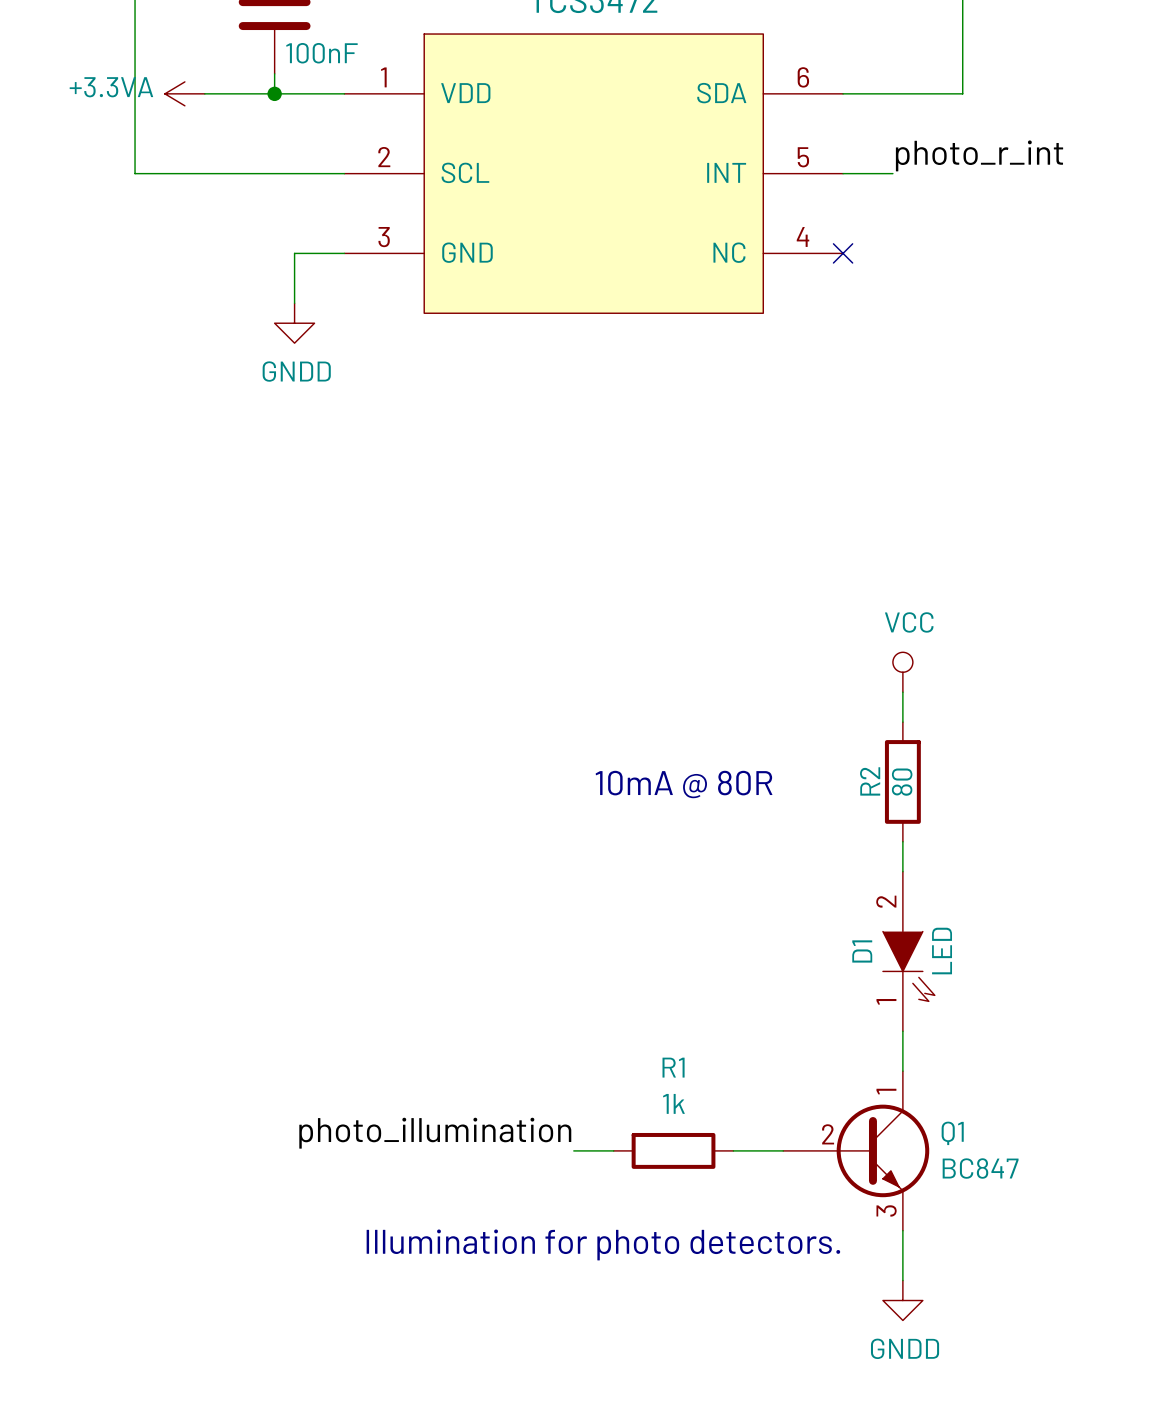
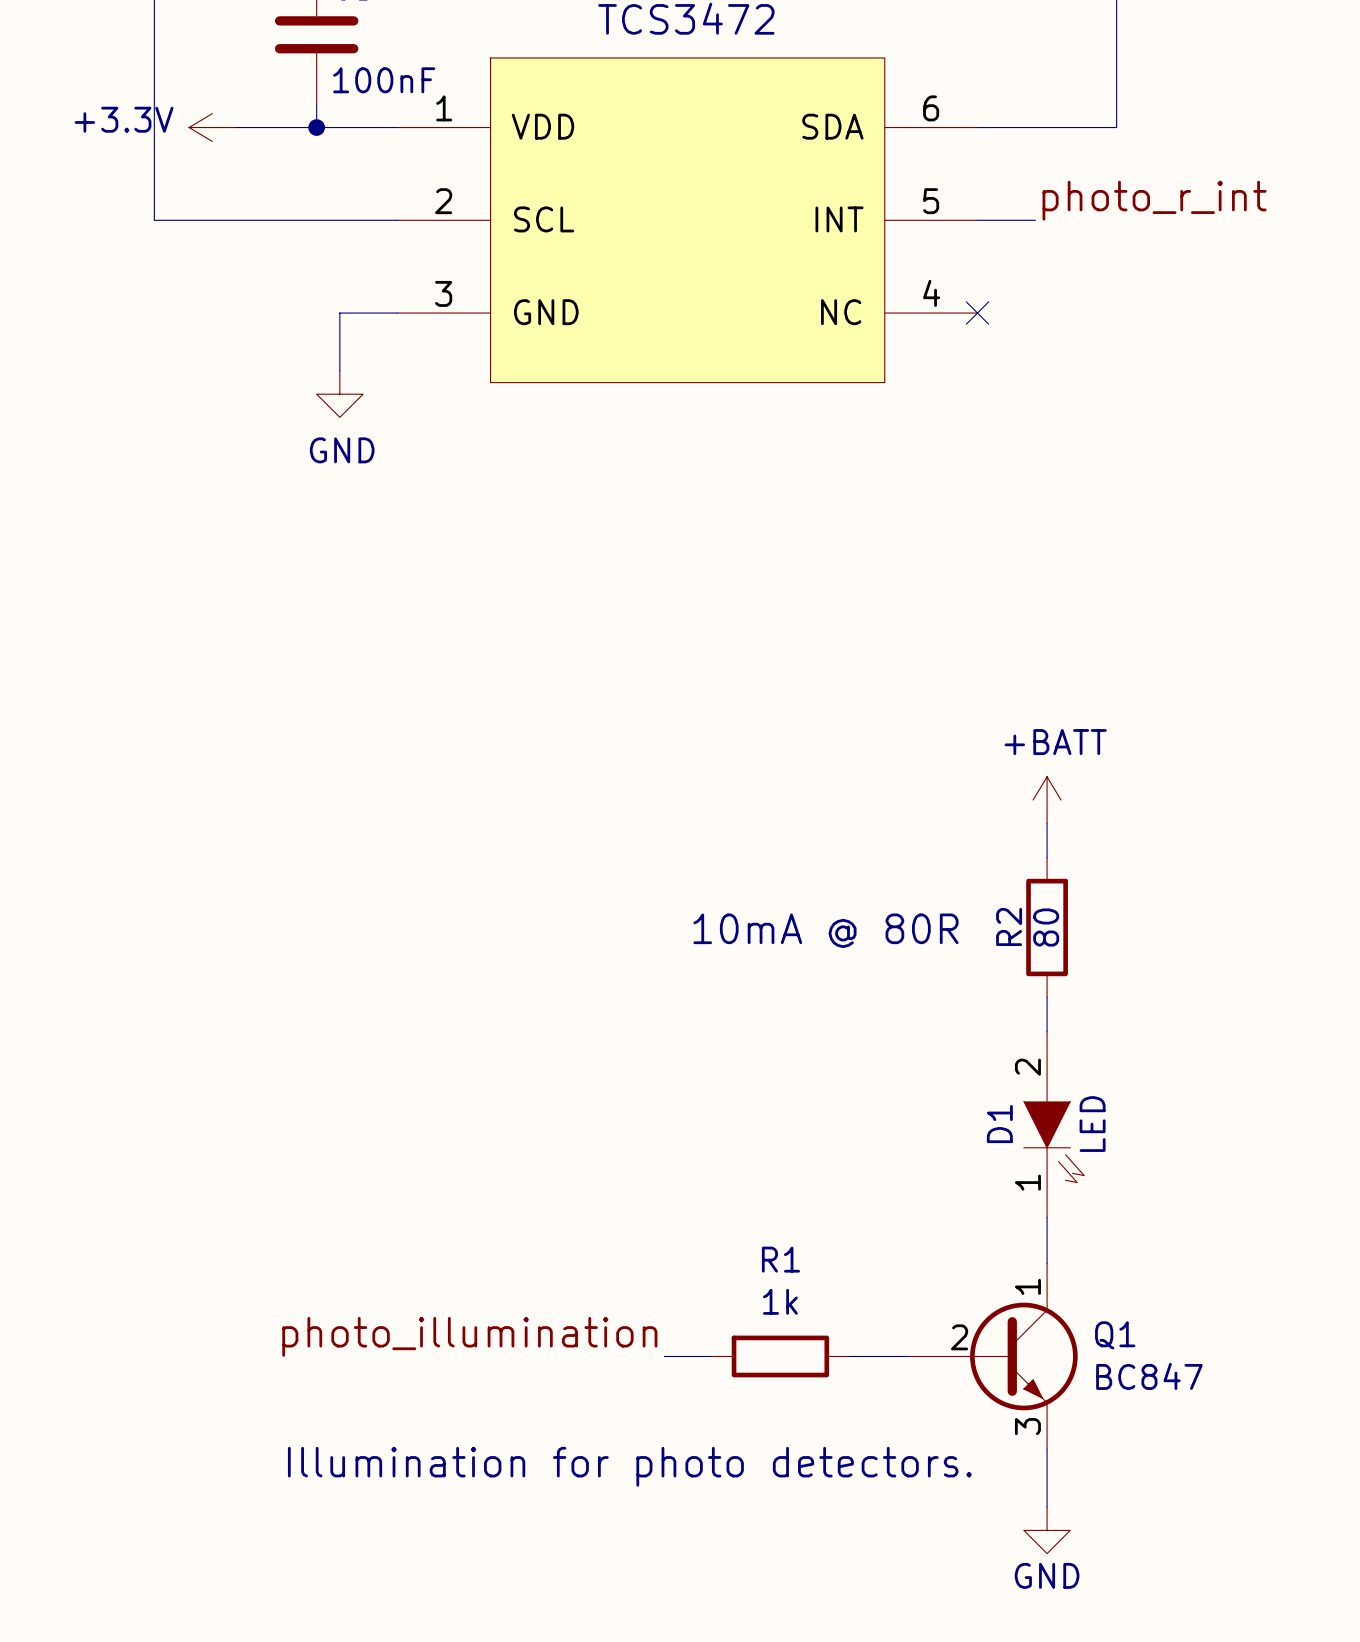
power symbol: +3.3VA (184, 93) -> +3.3V (212, 127)
power symbol: GNDD (294, 323) -> GND (339, 394)
power symbol: VCC (902, 672) -> +BATT (1047, 799)
power symbol: GNDD (902, 1300) -> GND (1047, 1530)

